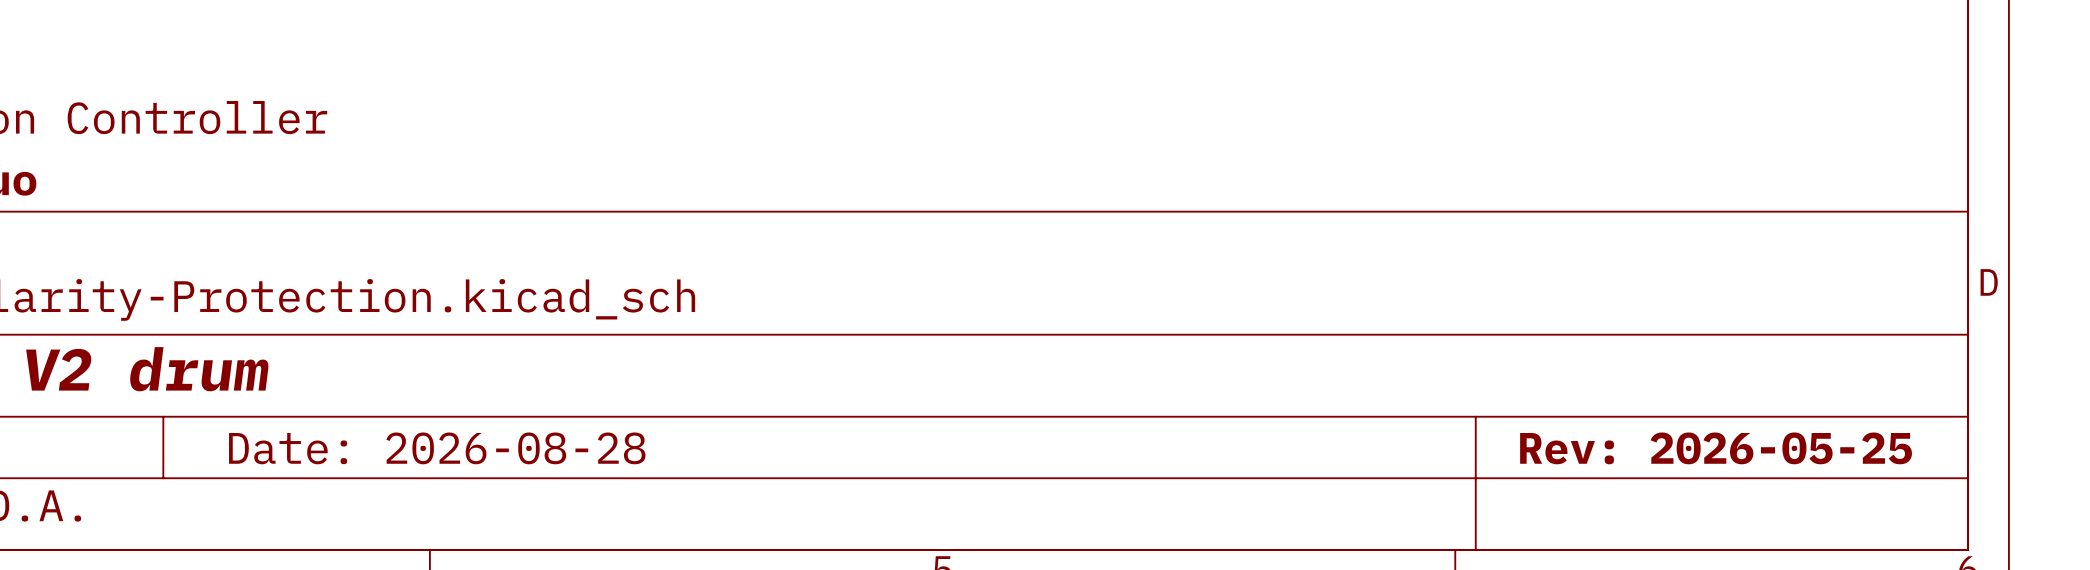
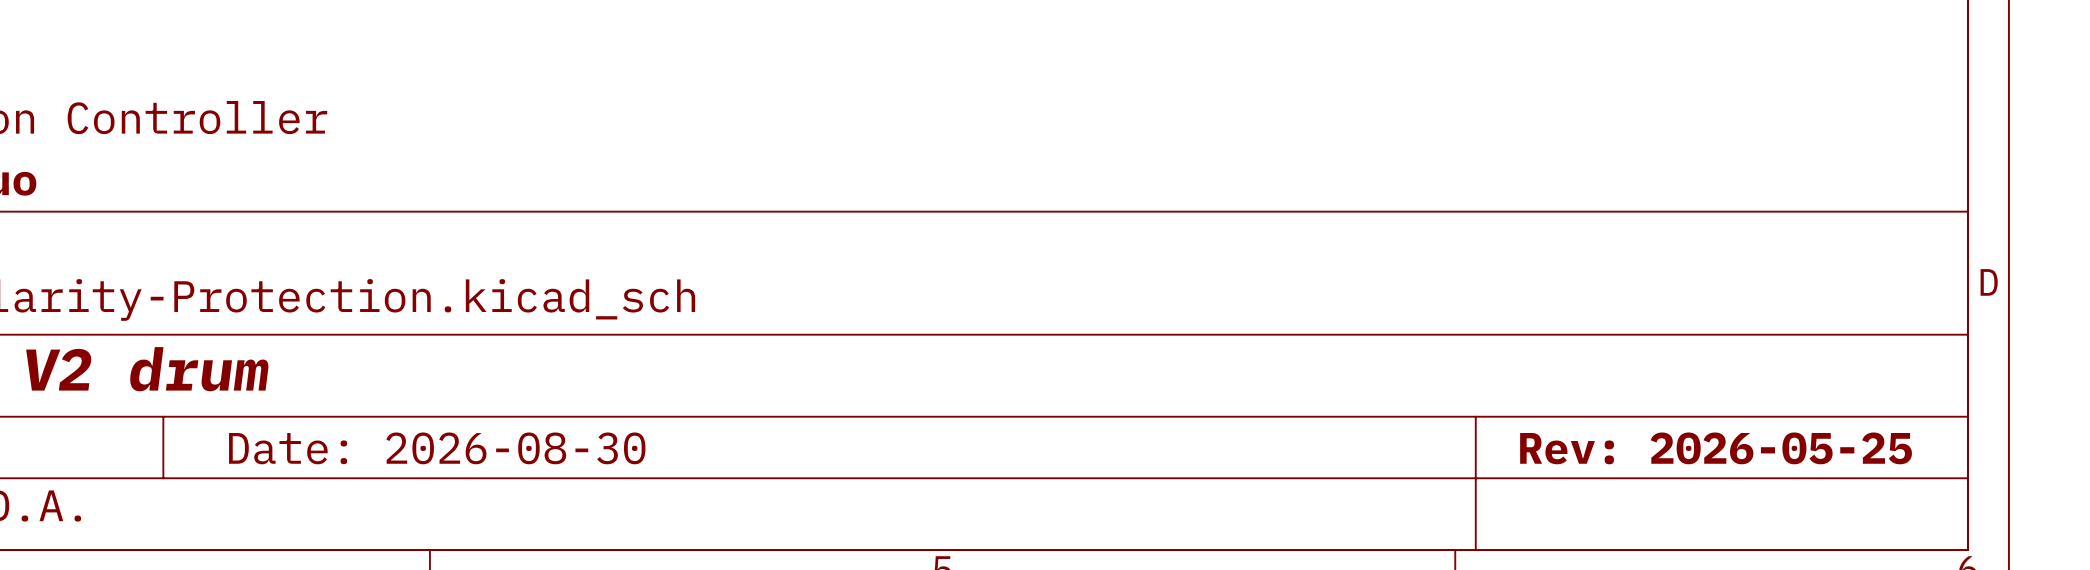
title block: Date: 2026-08-28 (437, 448) -> Date: 2026-08-30 (437, 448)

